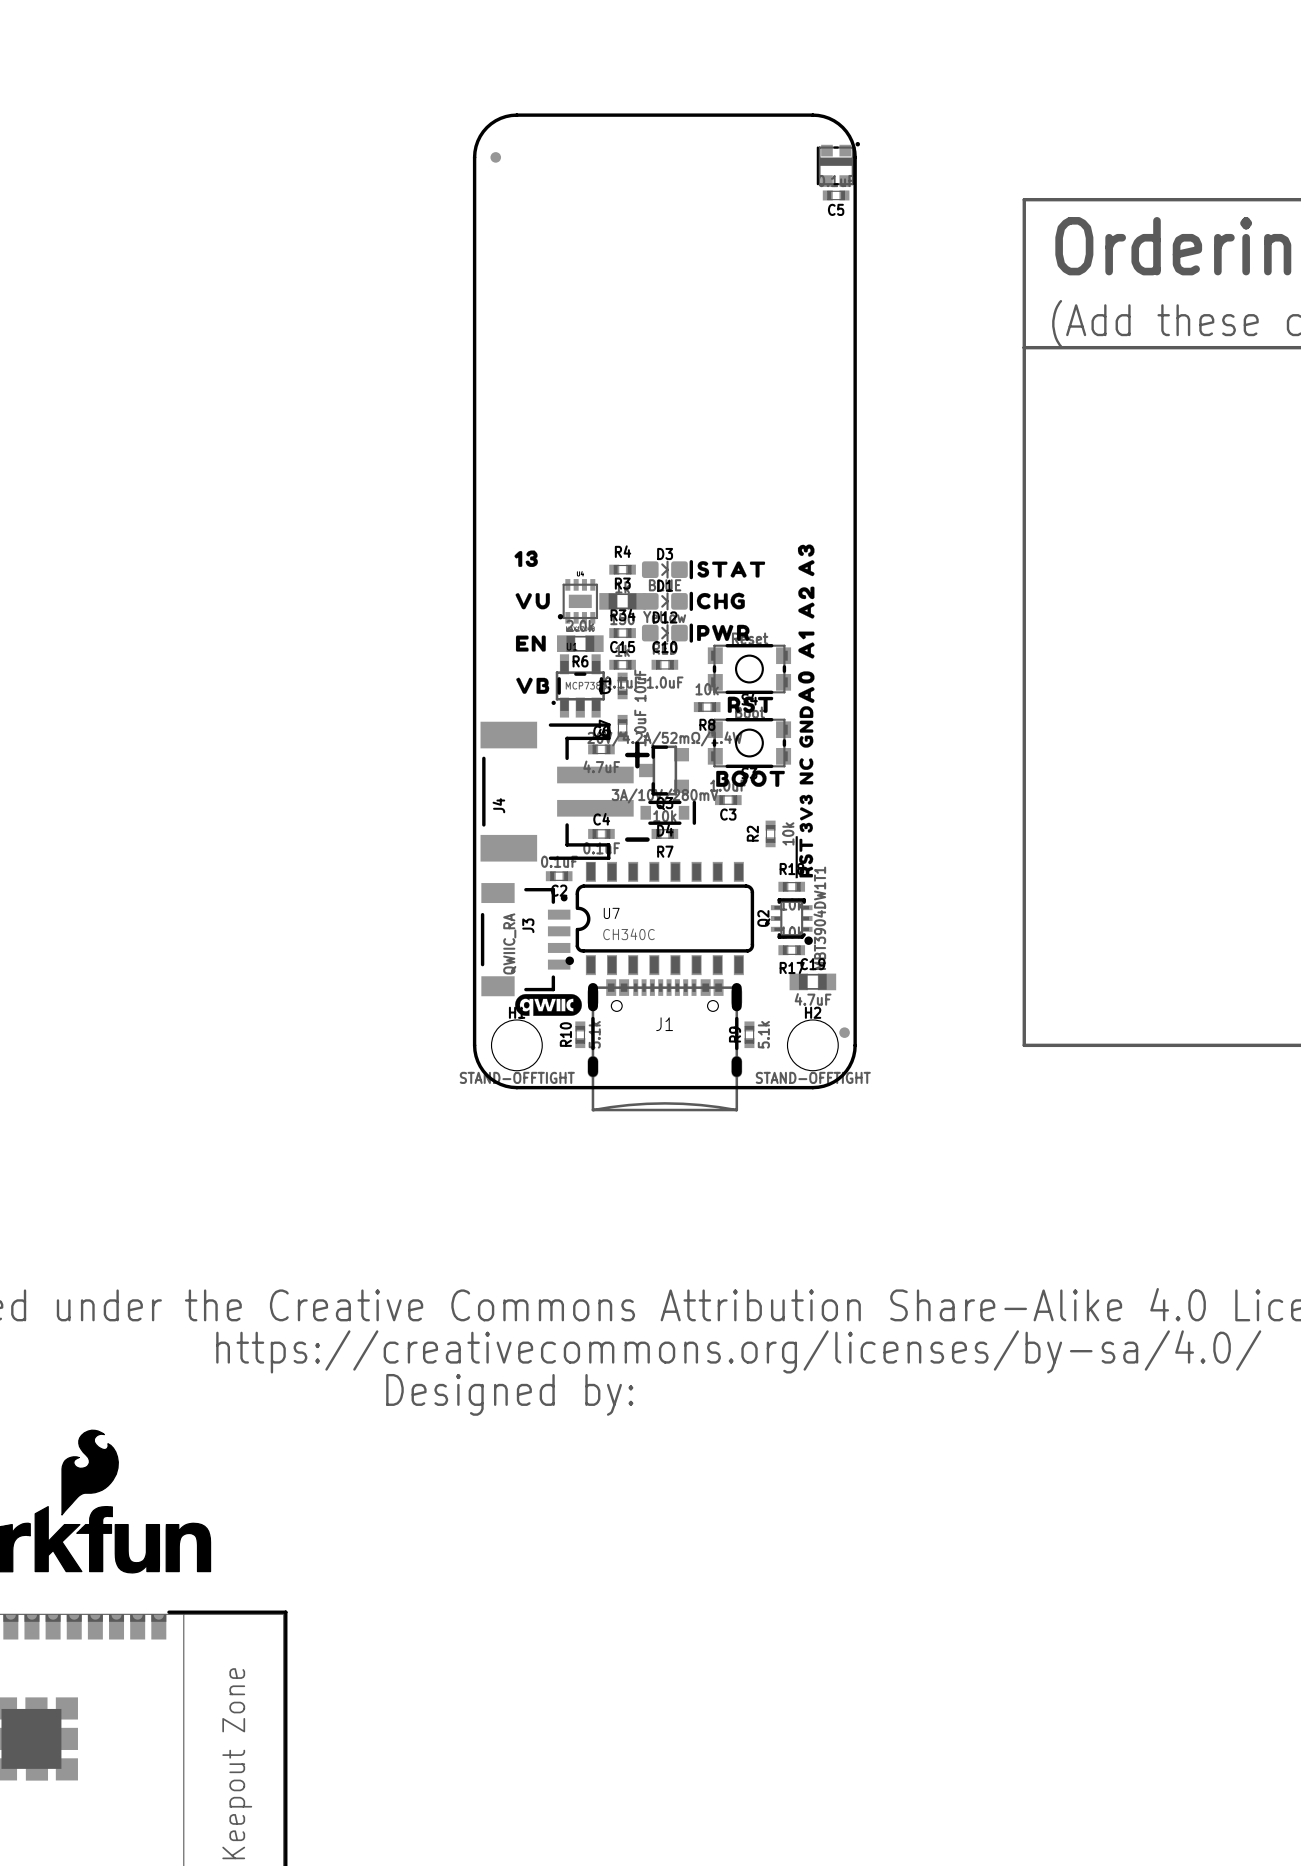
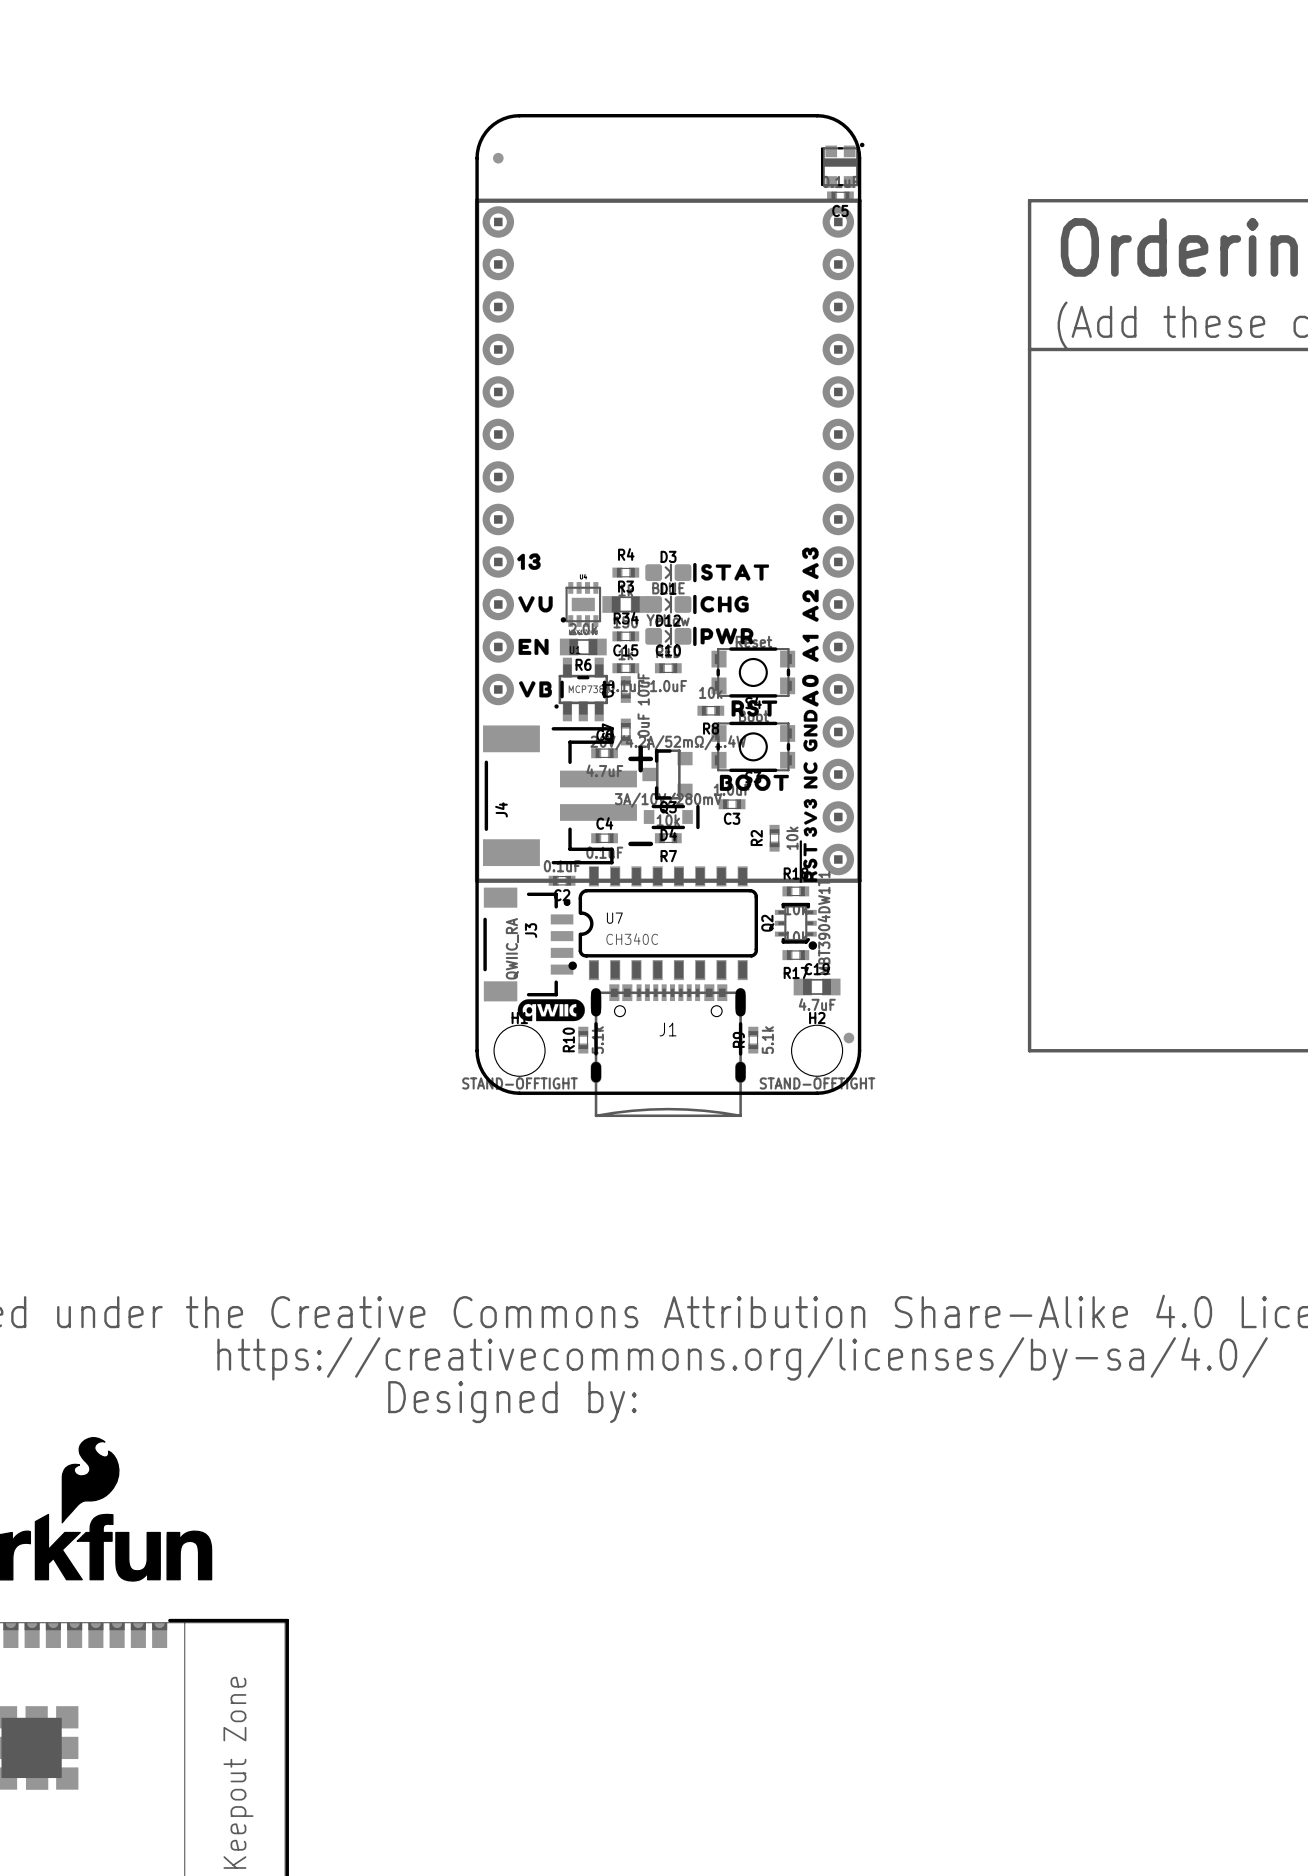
part: none -> (668, 540)

